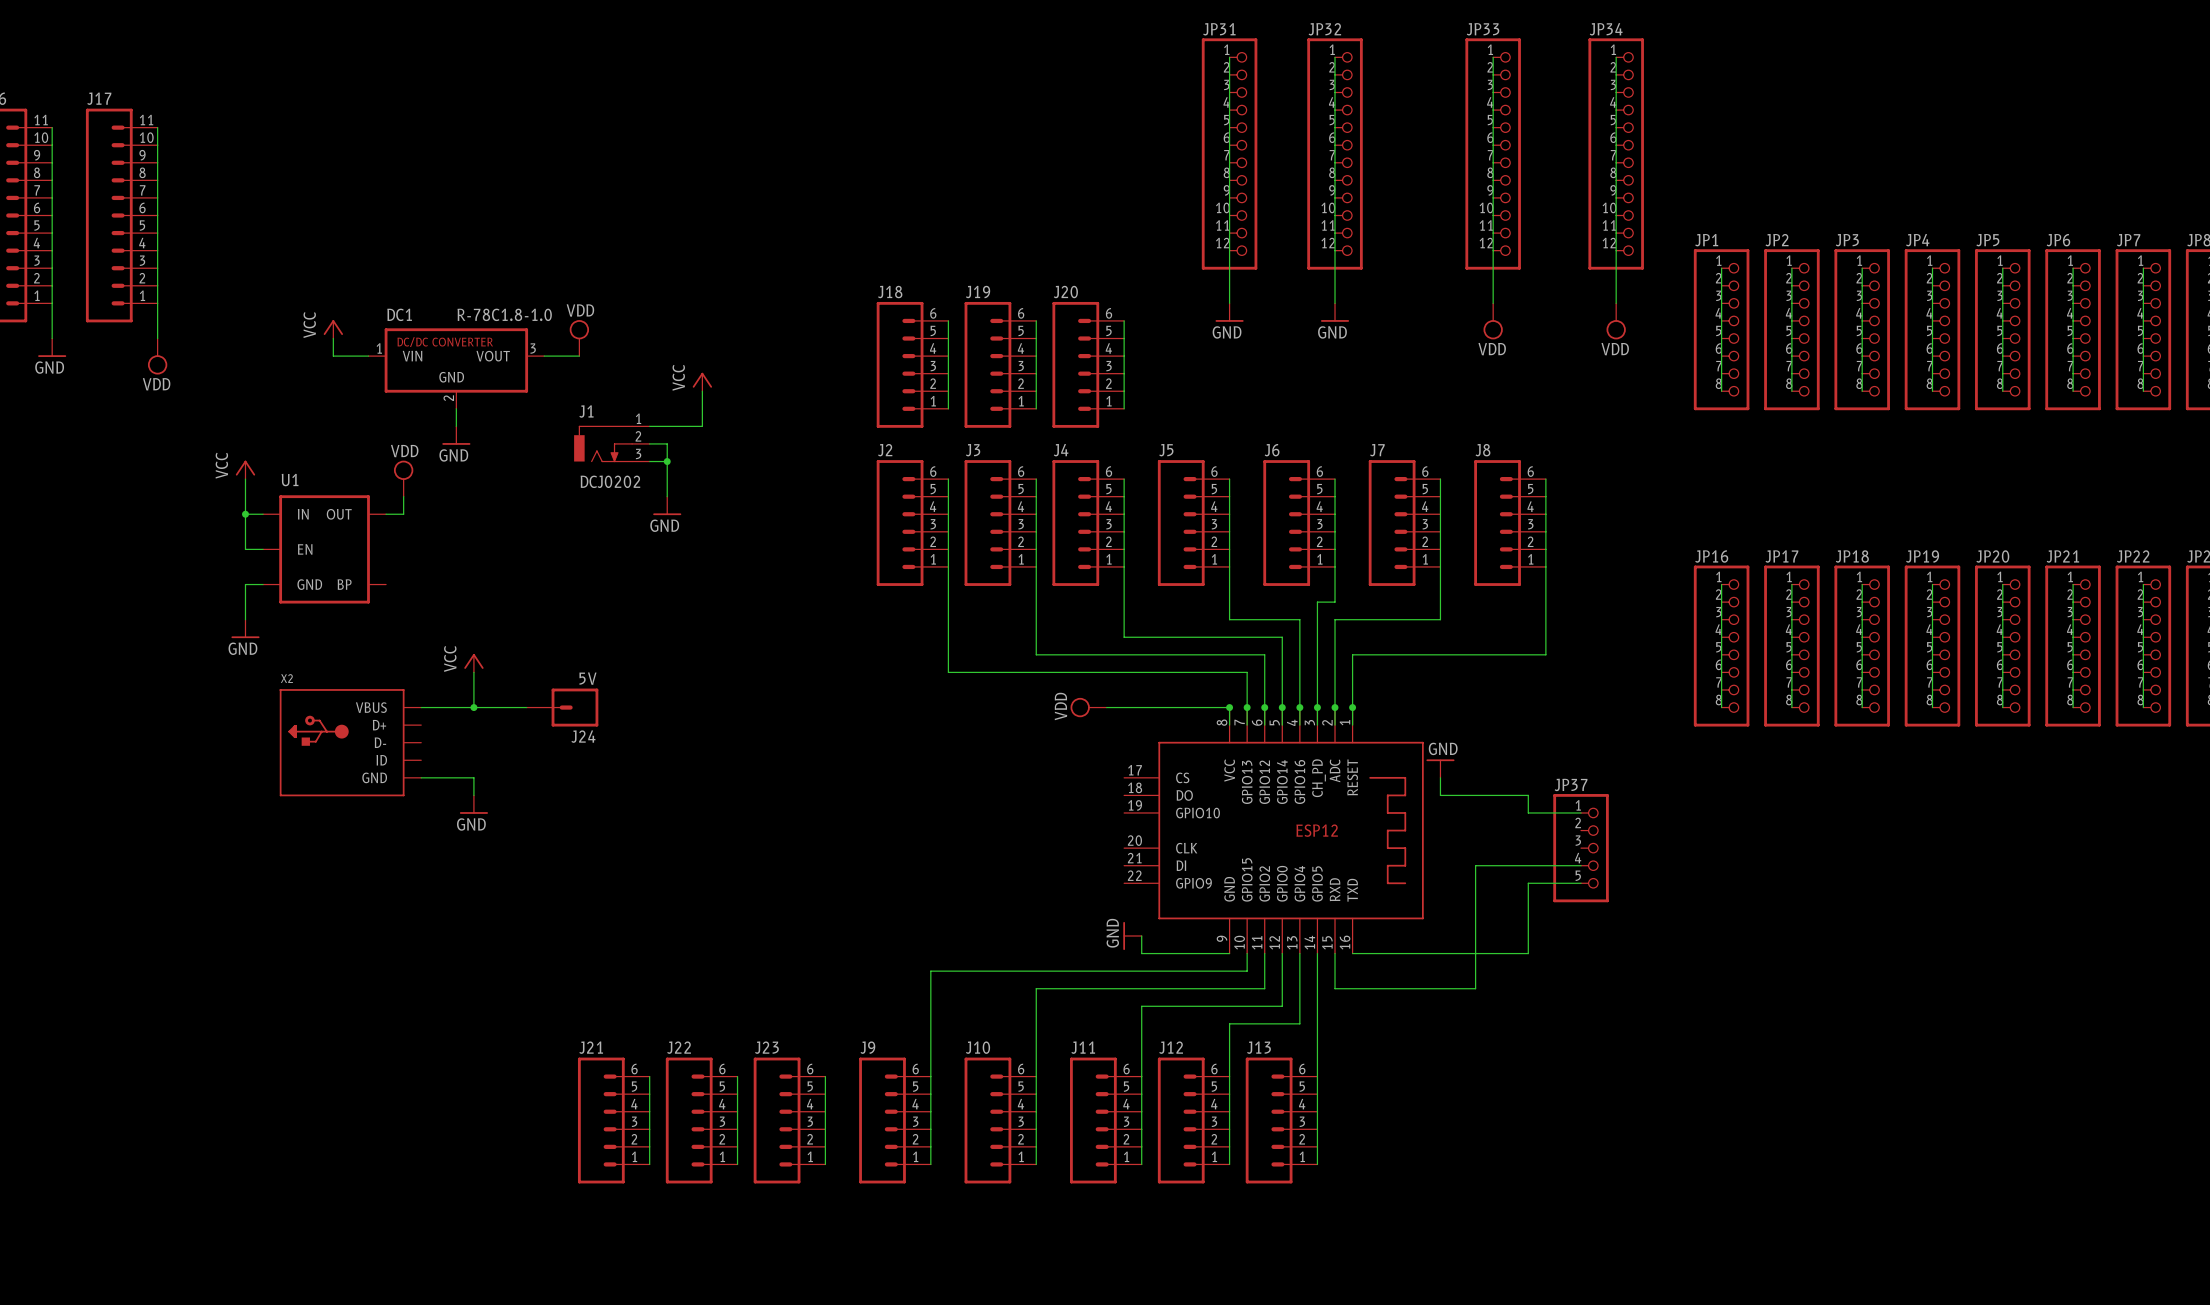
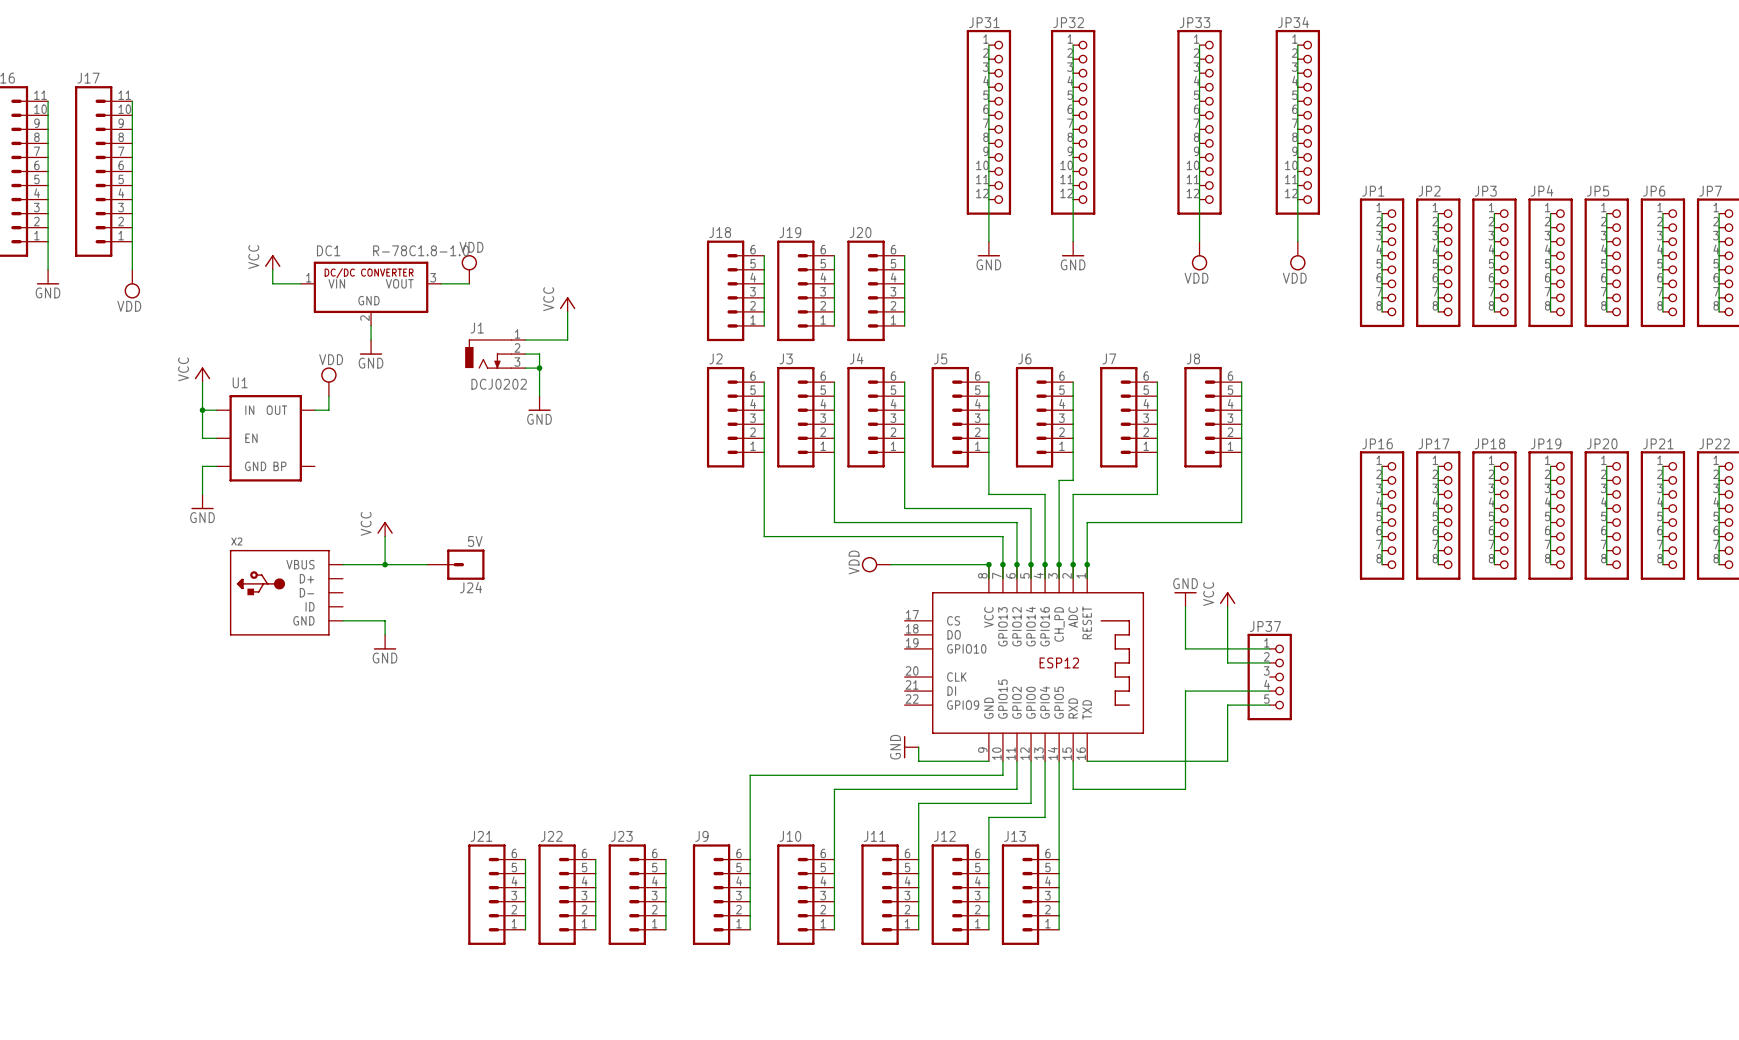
power symbol: none -> VCC (1227, 599)
wire: none -> (1185, 606) (1185, 648) (1227, 648) (1227, 662) (1269, 662)
power symbol position: GND (1440, 768) -> GND (1185, 599)
wire: (1440, 777) (1440, 795) (1528, 795) -> (1227, 606) (1227, 634)

